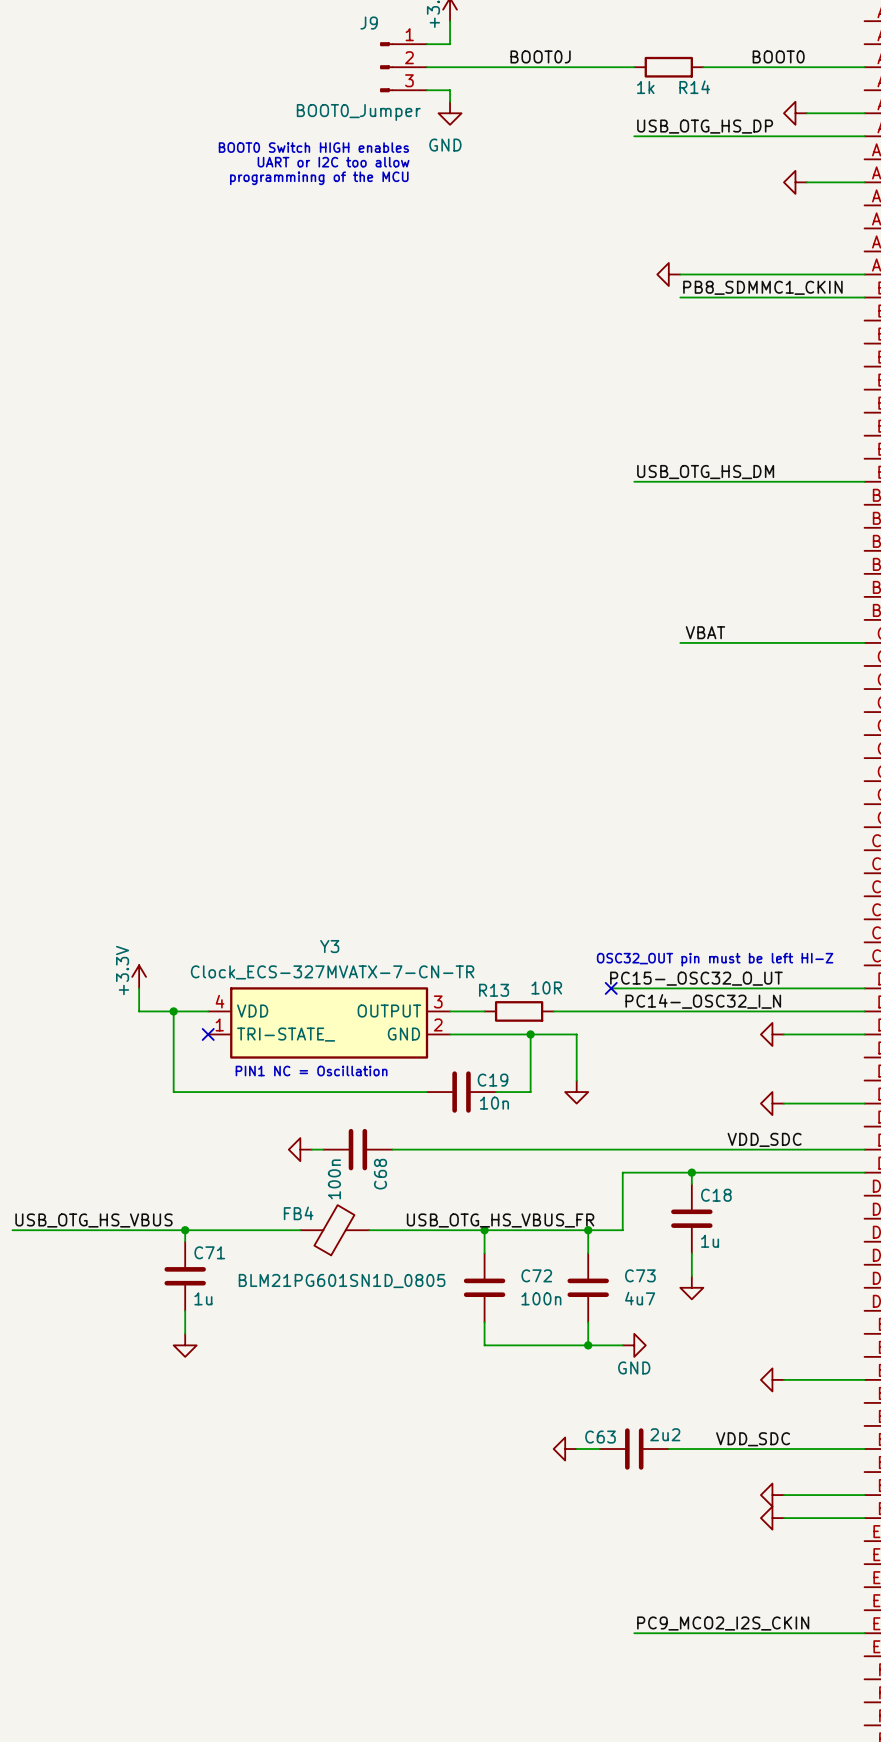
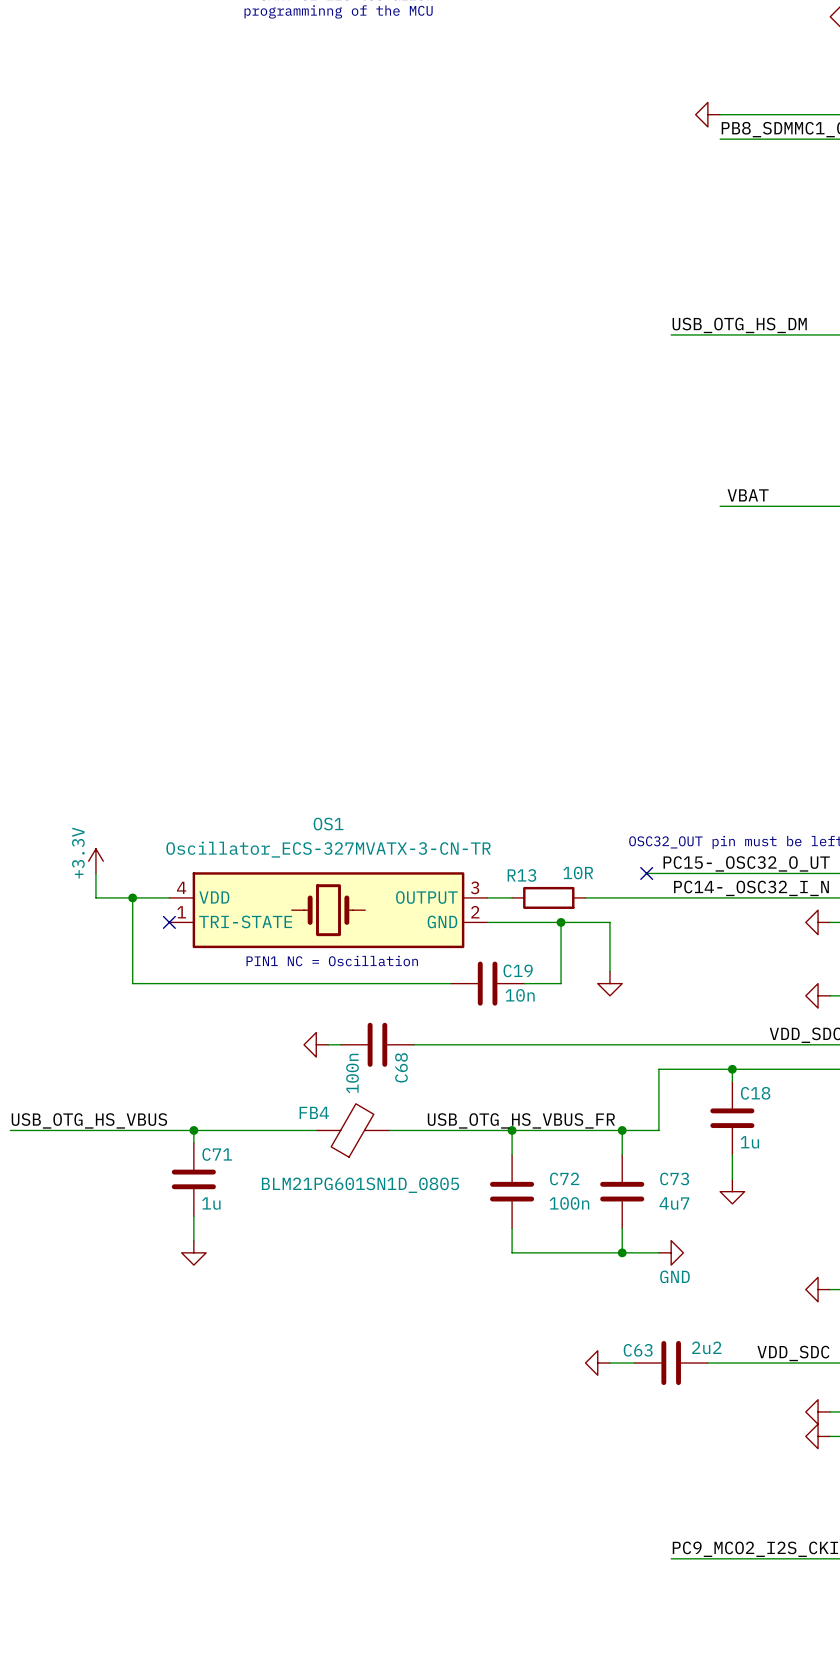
power symbol position: +3.3V (139, 976) -> +3.3V (95, 861)
wire: (139, 988) (139, 1011) -> (95, 873) (95, 897) (144, 897)
wire: (173, 1011) (173, 1092) -> (132, 897) (132, 983) (181, 983)
junction position: (173, 1011) -> (132, 897)
OS1: none -> Oscillator_ECS-327MVATX-3-CN-TR (328, 910)
Y3: Clock_ECS-327MVATX-7-CN-TR (329, 1022) -> none
no-connect mark position: (208, 1034) -> (169, 922)

